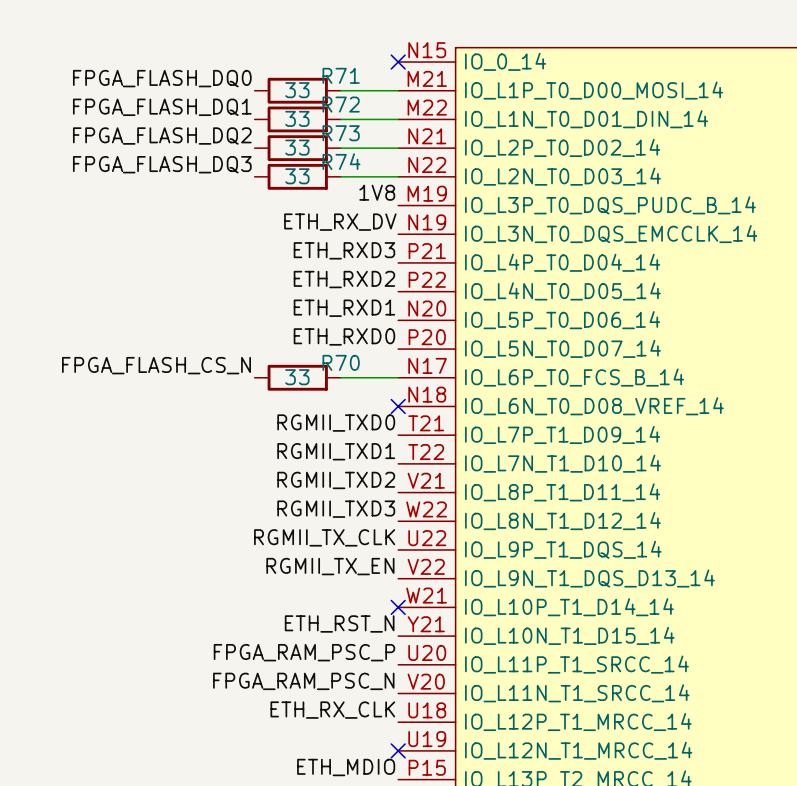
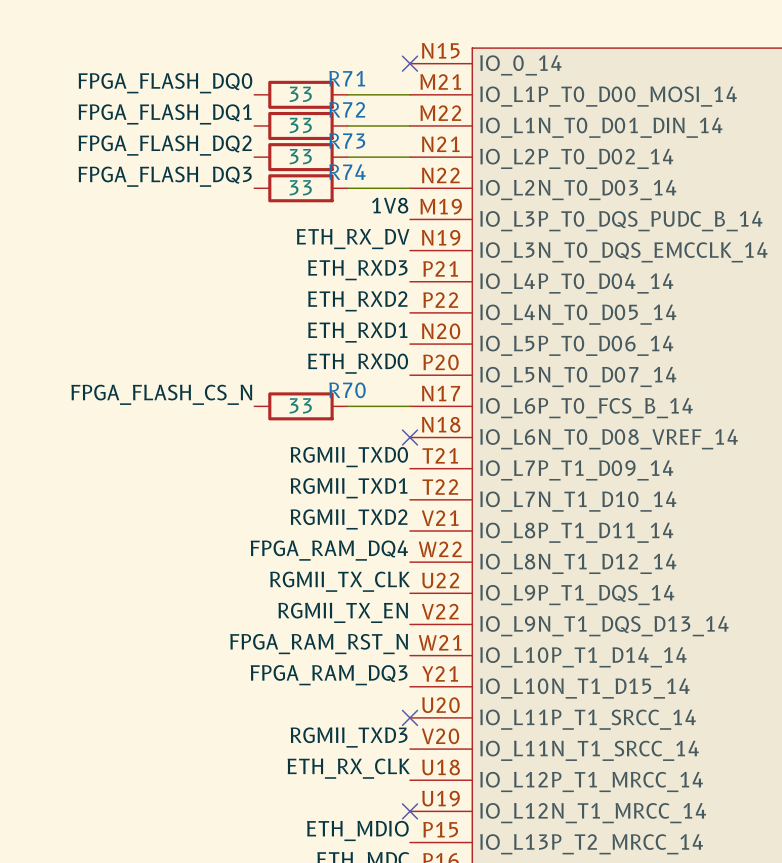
label: RGMII_TXD3 (336, 509) -> FPGA_RAM_DQ4 (329, 550)
label: none -> FPGA_RAM_RST_N (319, 644)
no-connect mark position: (398, 607) -> (409, 717)
label: ETH_RST_N (339, 623) -> FPGA_RAM_DQ3 (329, 675)
label: FPGA_RAM_PSC_P (304, 652) -> none
label: FPGA_RAM_PSC_N (303, 681) -> RGMII_TXD3 (349, 737)

